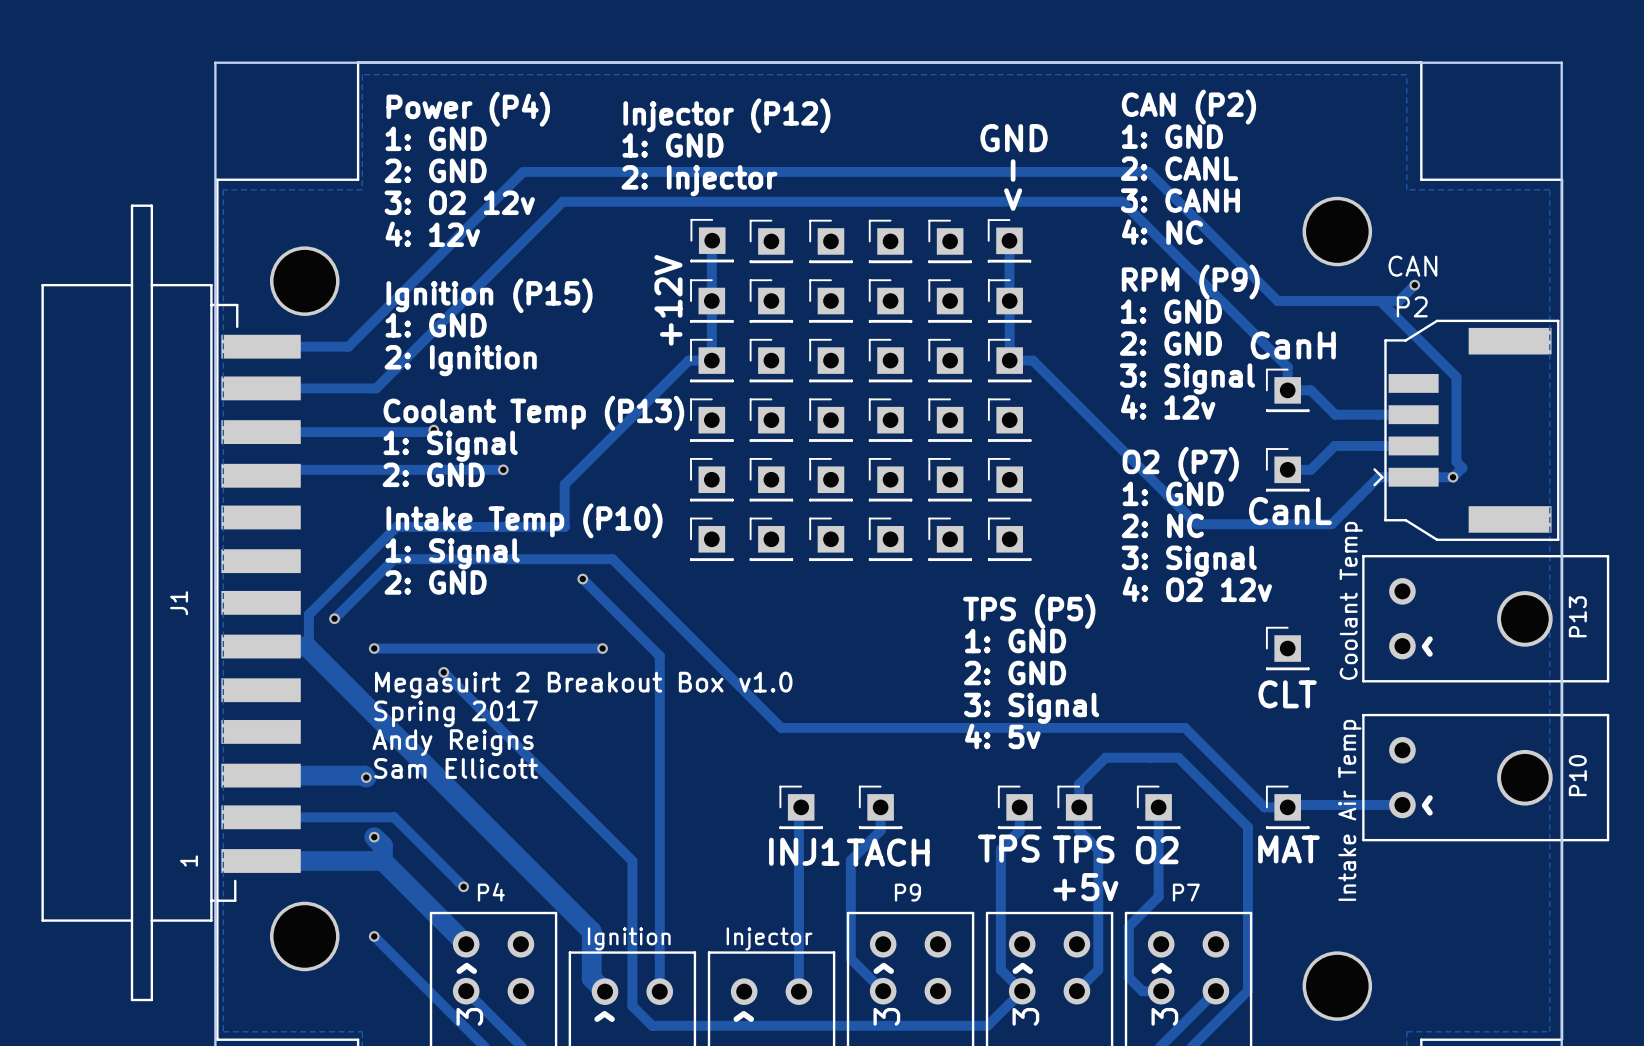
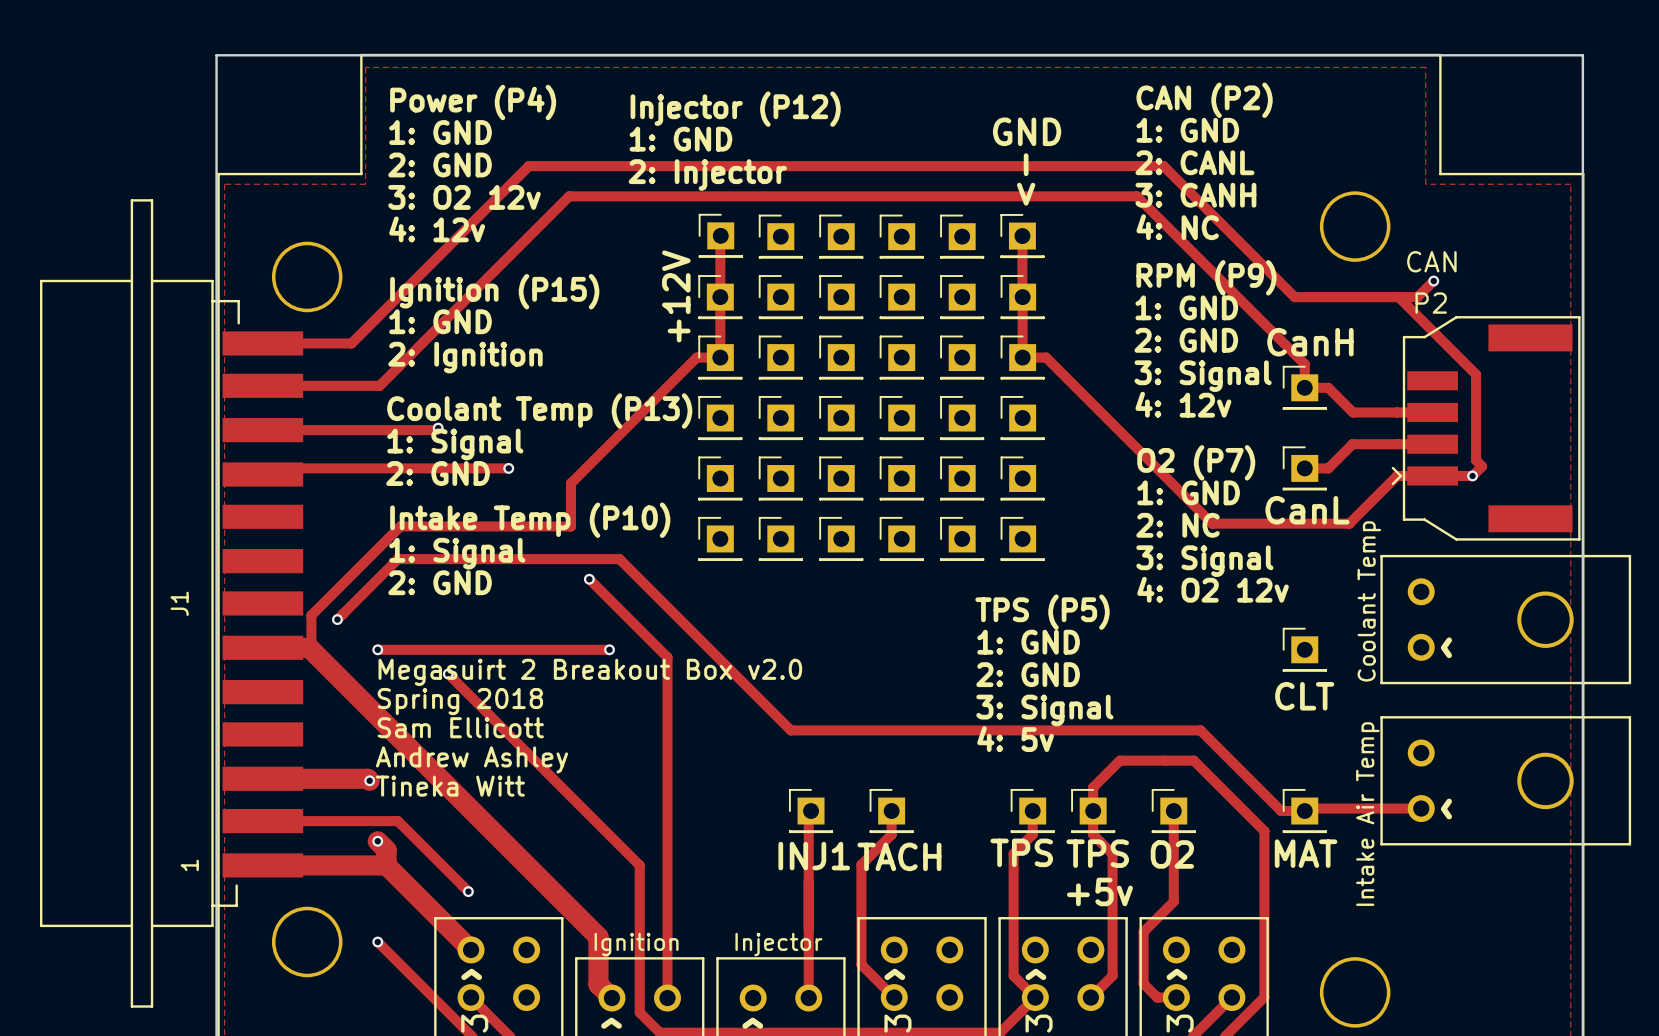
P13 name: P13 (1577, 616) -> none
text: Megasuirt 2 Breakout Box v1.0 (583, 685) -> Megasuirt 2 Breakout Box v2.0 (590, 672)
text: Spring 2017 (456, 713) -> Spring 2018 (460, 701)
text: Andy Reigns (453, 742) -> none
text: none -> Andrew Ashley (472, 759)
text position: Sam Ellicott (456, 768) -> Sam Ellicott (460, 727)
P10 name: P10 (1577, 775) -> none
text: none -> Tineka Witt (450, 786)
P4 name: P4 (491, 892) -> none
P9 name: P9 (907, 892) -> none
P7 name: P7 (1186, 892) -> none

